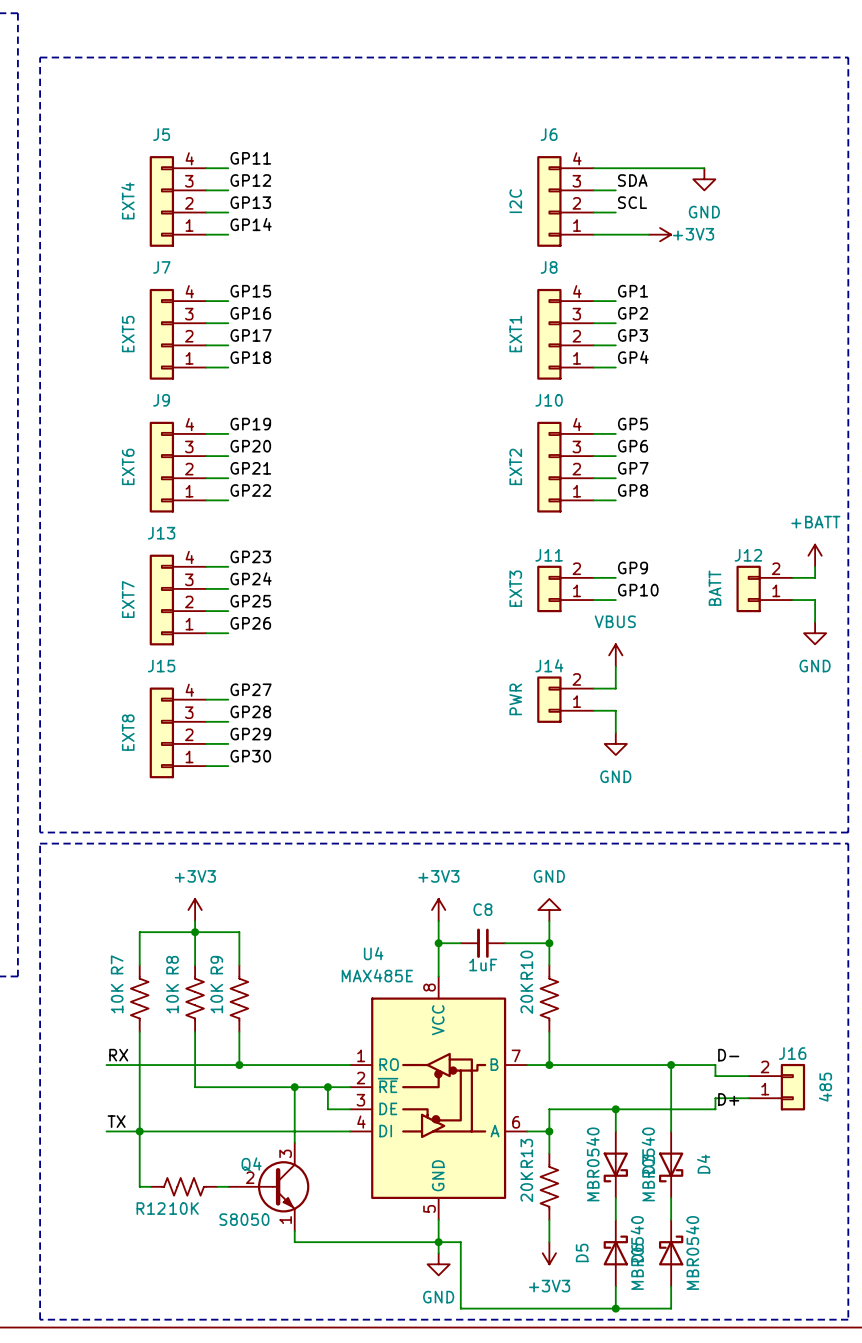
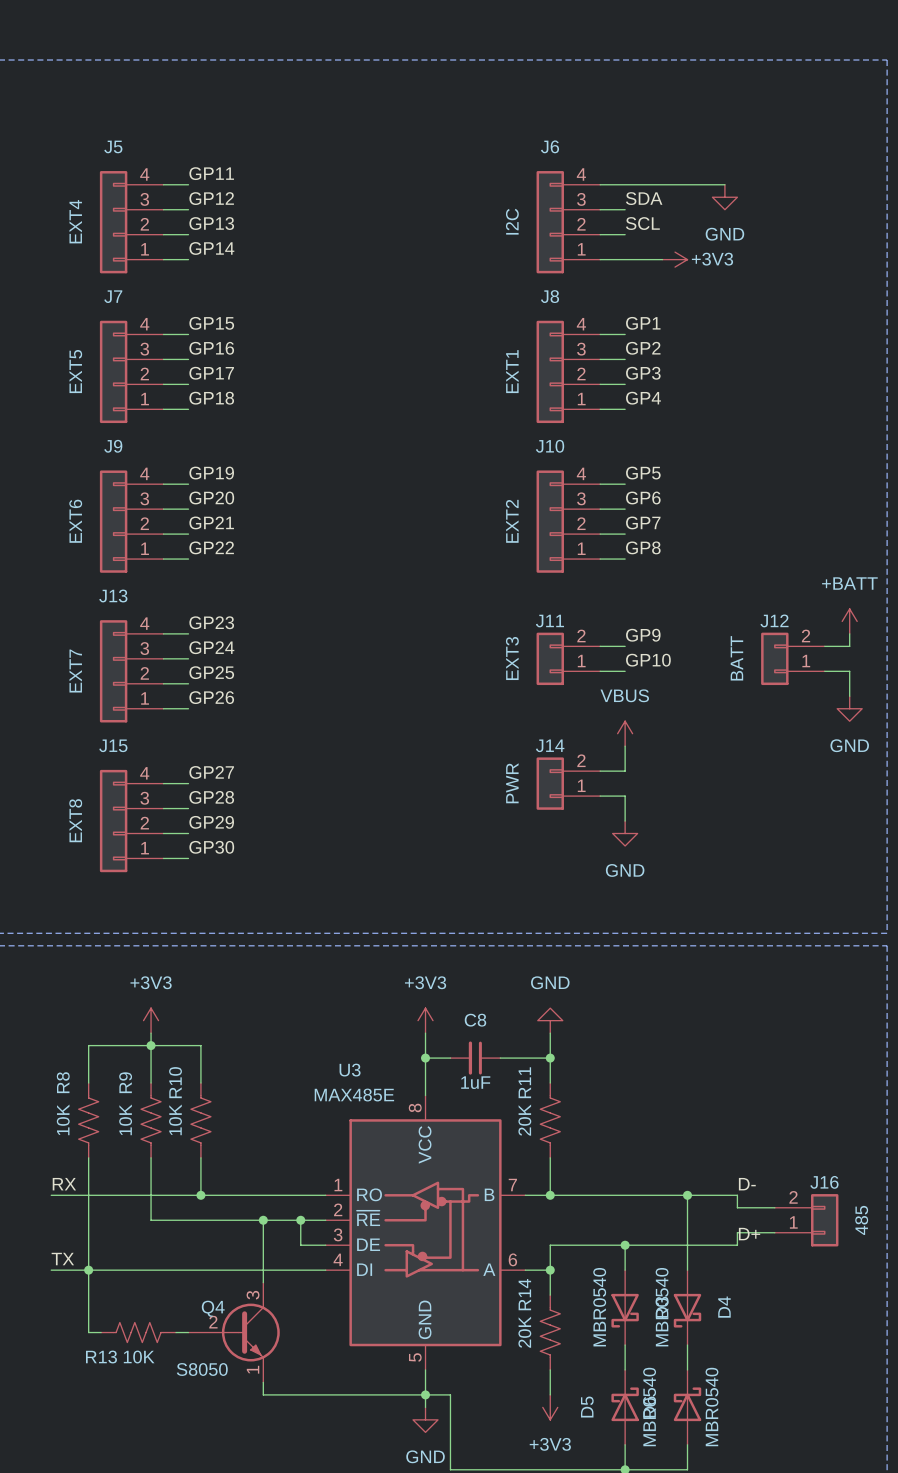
U4 name: U4 (373, 953) -> U3 (350, 1070)
R7 name: R7 (117, 964) -> R8 (63, 1082)
R8 name: R8 (172, 965) -> R9 (125, 1082)
R9 name: R9 (216, 965) -> R10 (175, 1082)
R10 name: R10 (526, 965) -> R11 (524, 1082)
R13 name: R13 (526, 1153) -> R14 (524, 1294)
R12 name: R12 (151, 1208) -> R13 (101, 1357)

